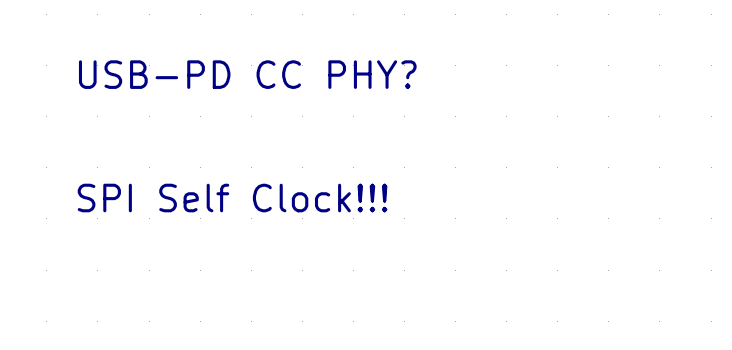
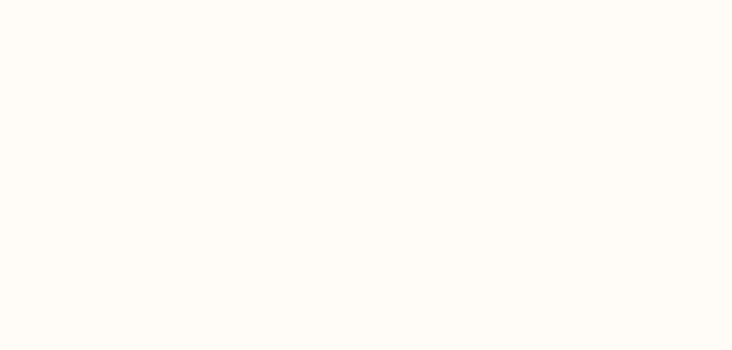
text: USB-PD CC PHY? (247, 74) -> none
text: SPI Self Clock!!! (232, 198) -> none

